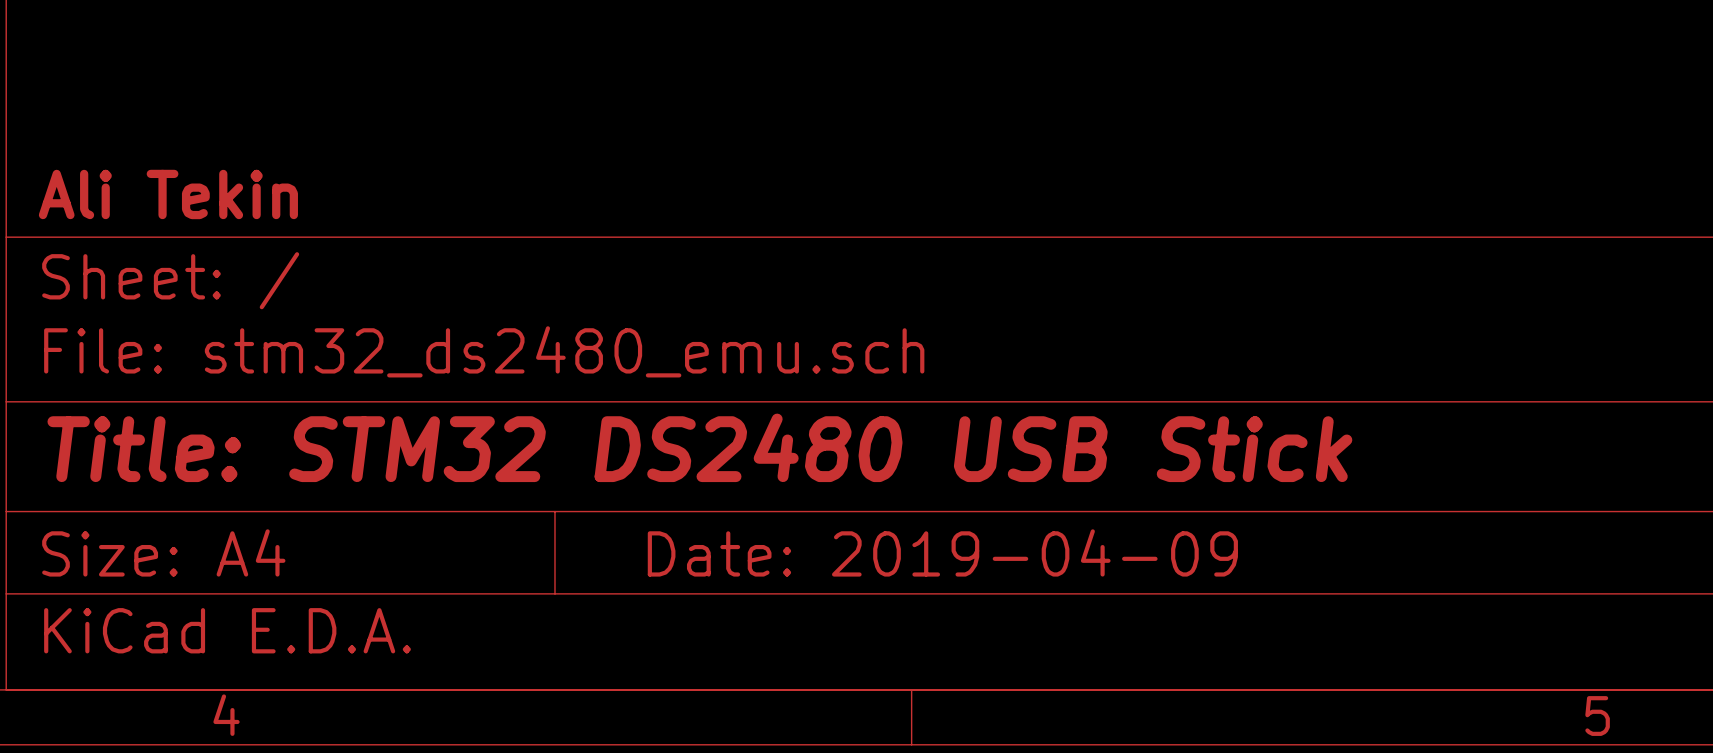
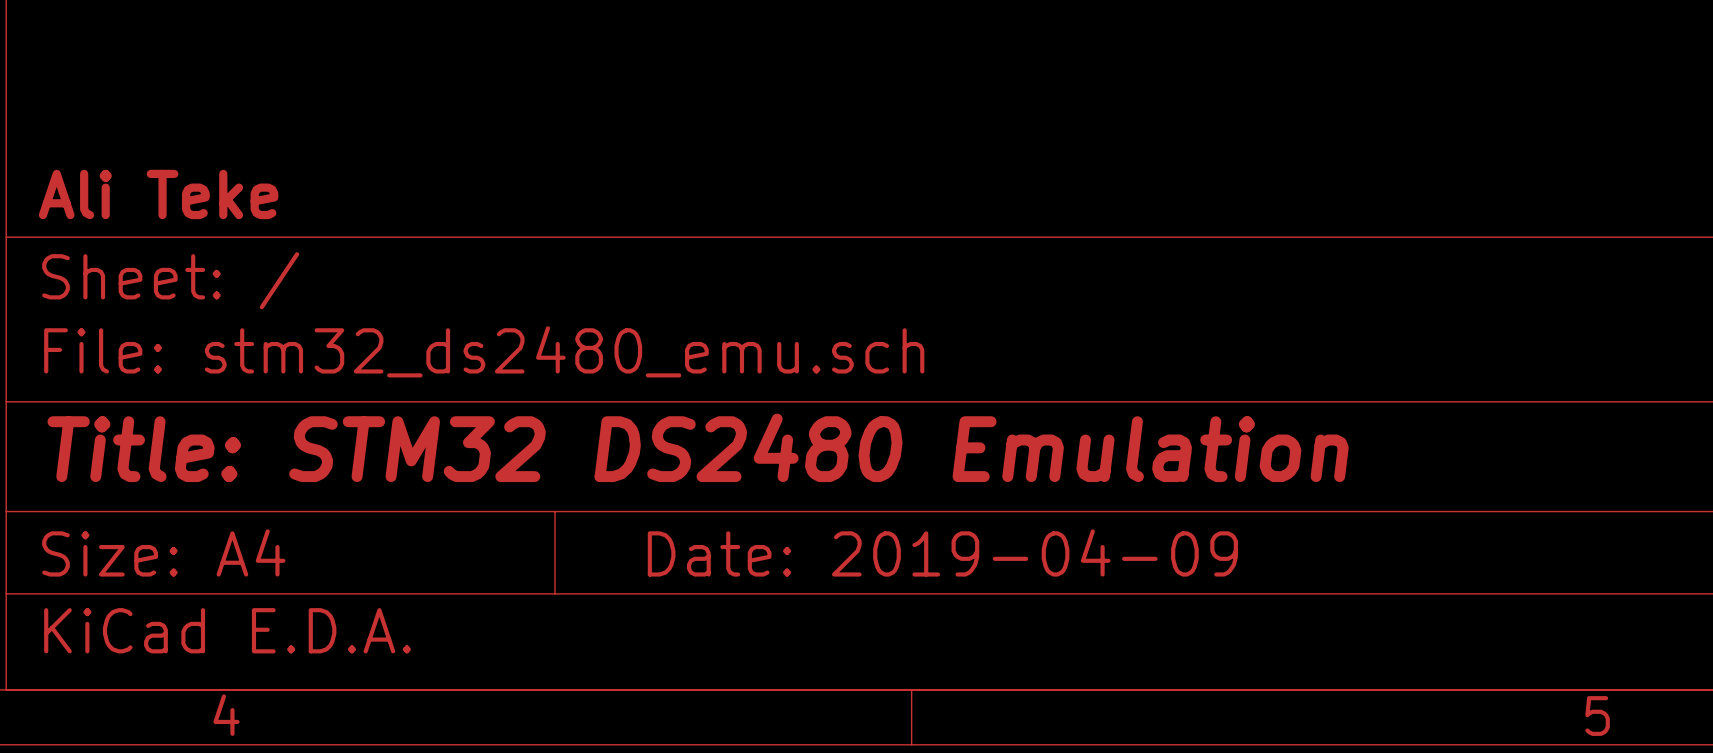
title block: Ali Tekin (168, 194) -> Ali Teke (158, 194)
title block: Title: STM32 DS2480 USB Stick (699, 447) -> Title: STM32 DS2480 Emulation (698, 447)

